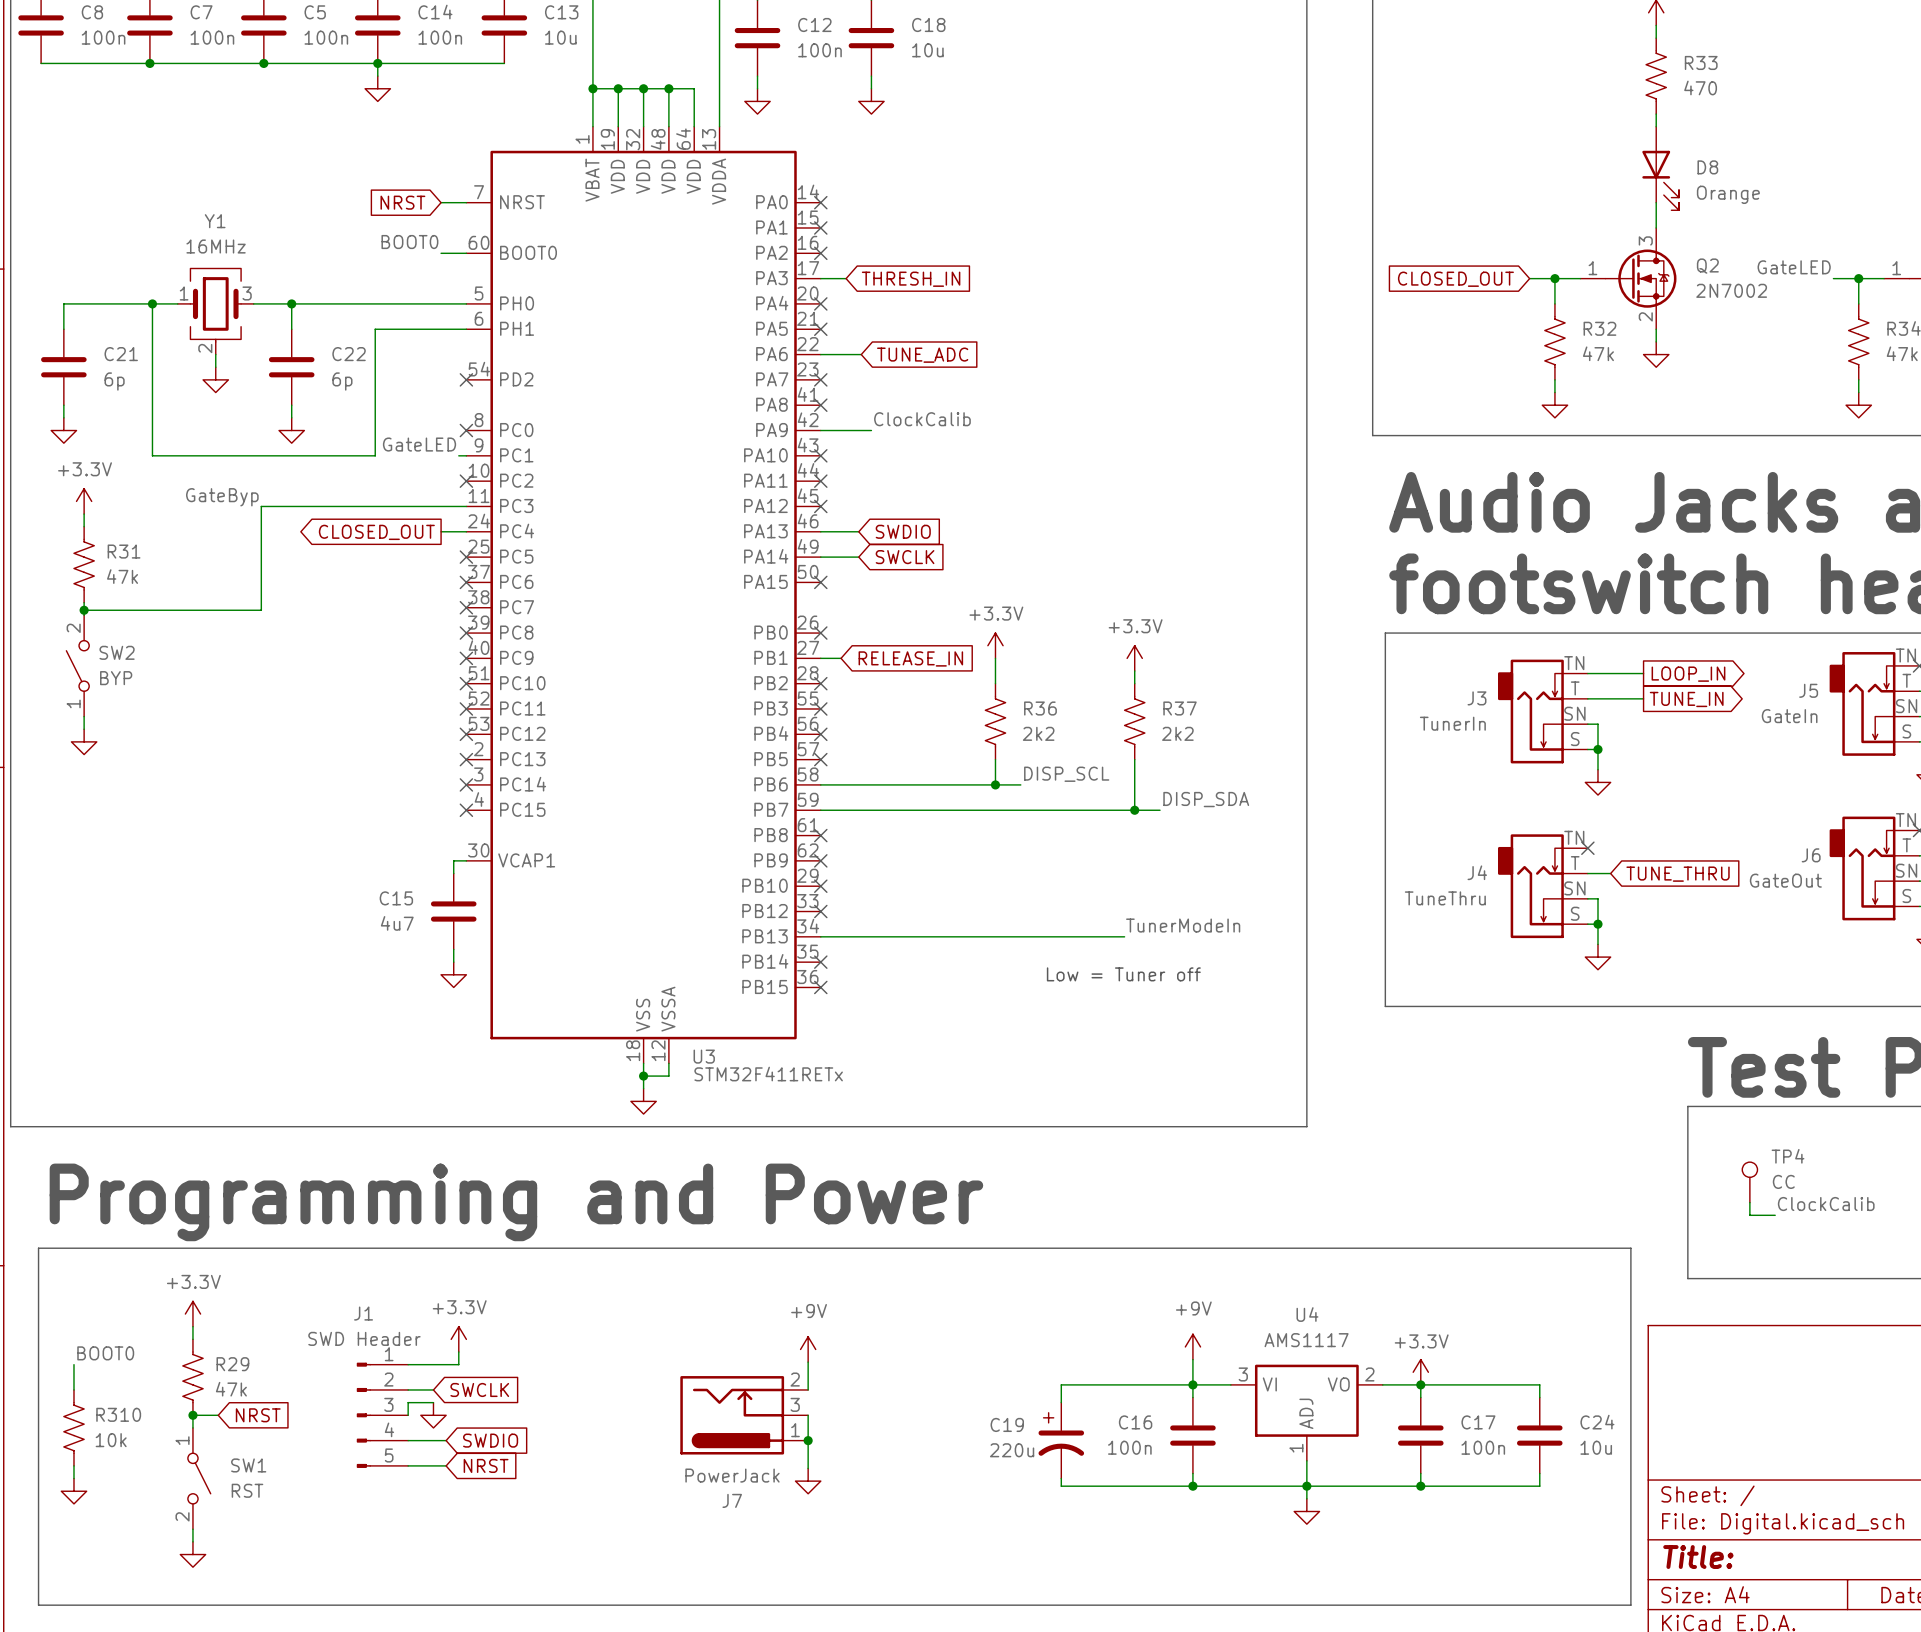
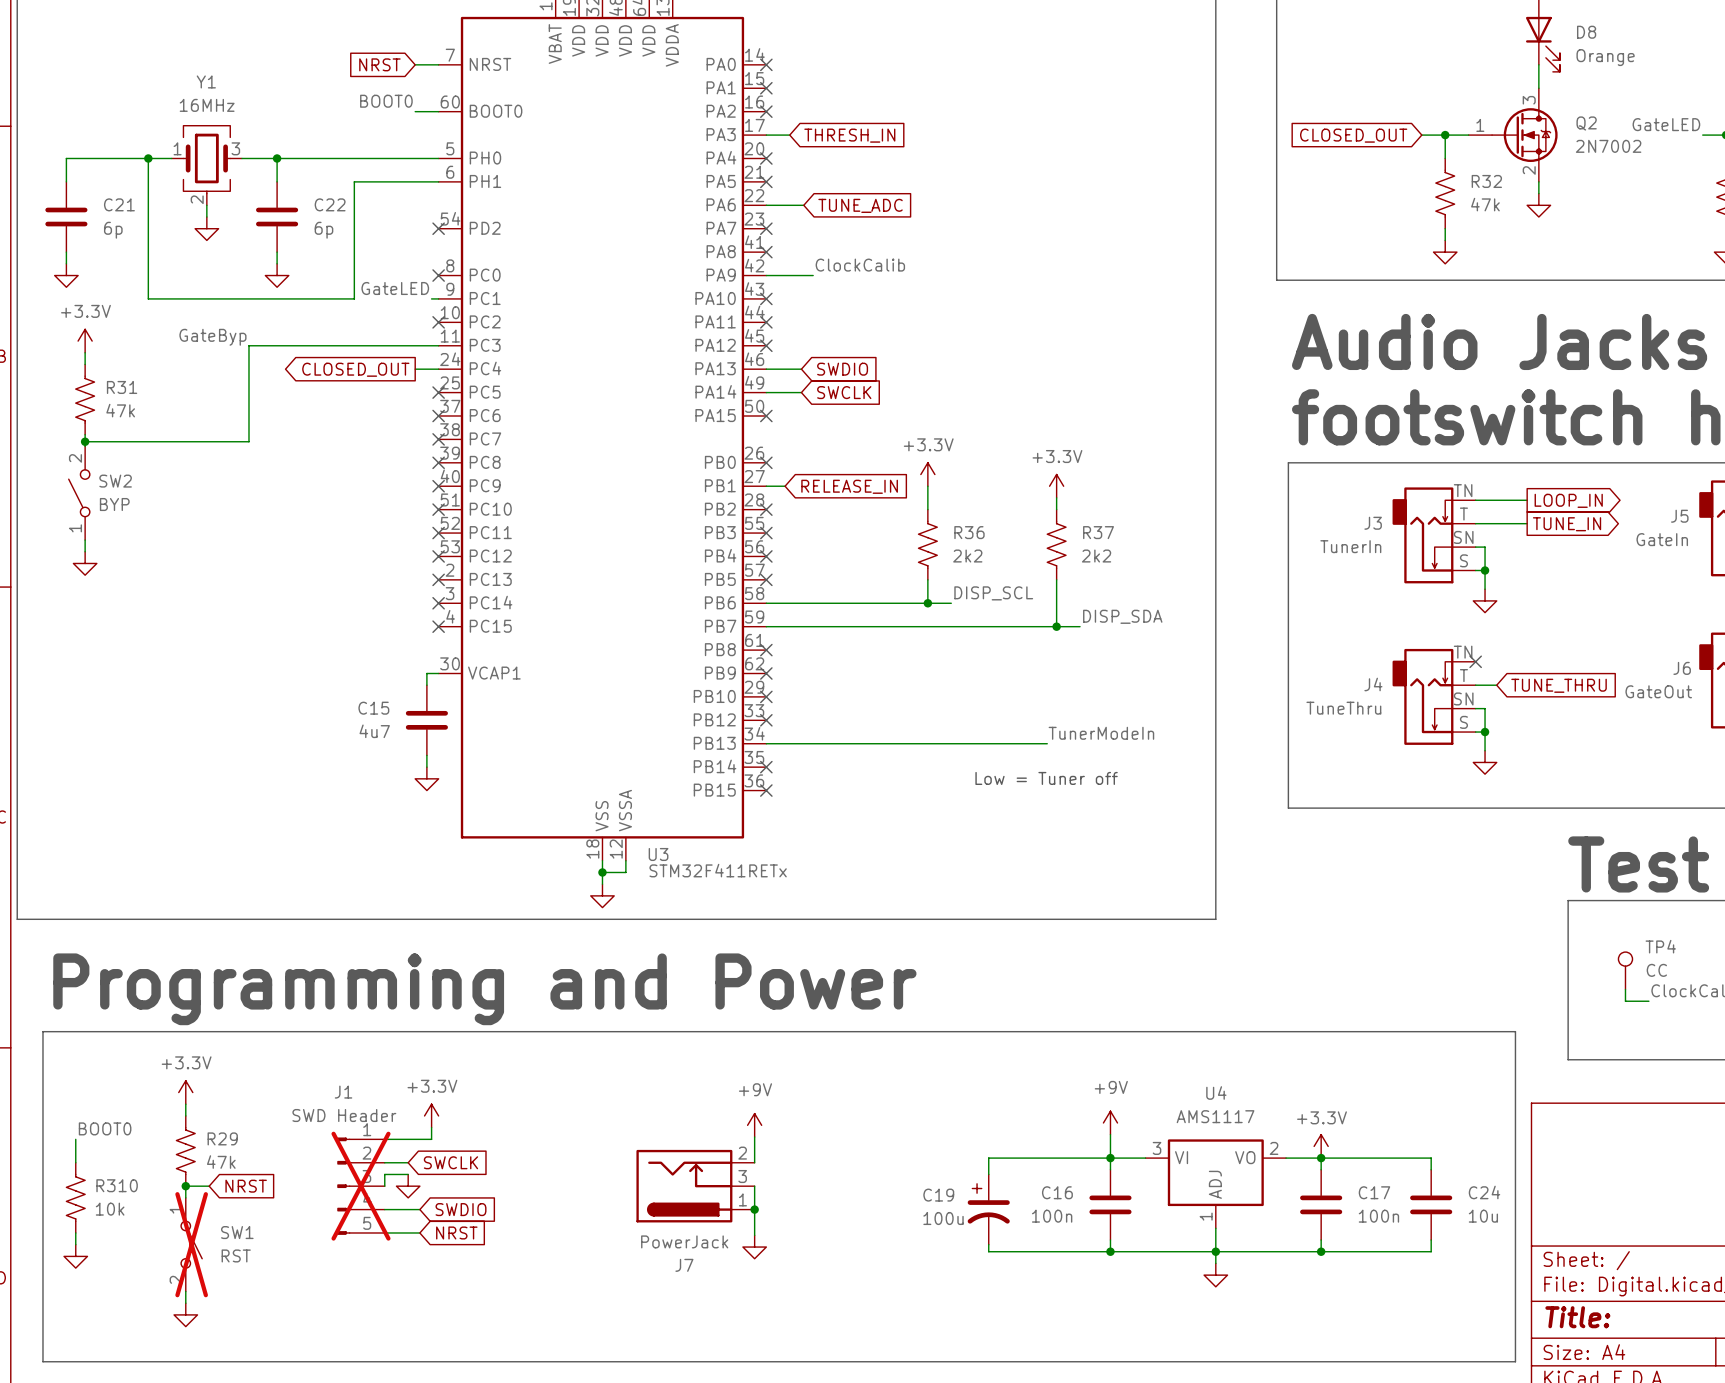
J1 do-not-place cross: none -> (361, 1186)
C19 value: 220u (1012, 1450) -> 100u (943, 1218)
SW1 do-not-place cross: none -> (191, 1244)

